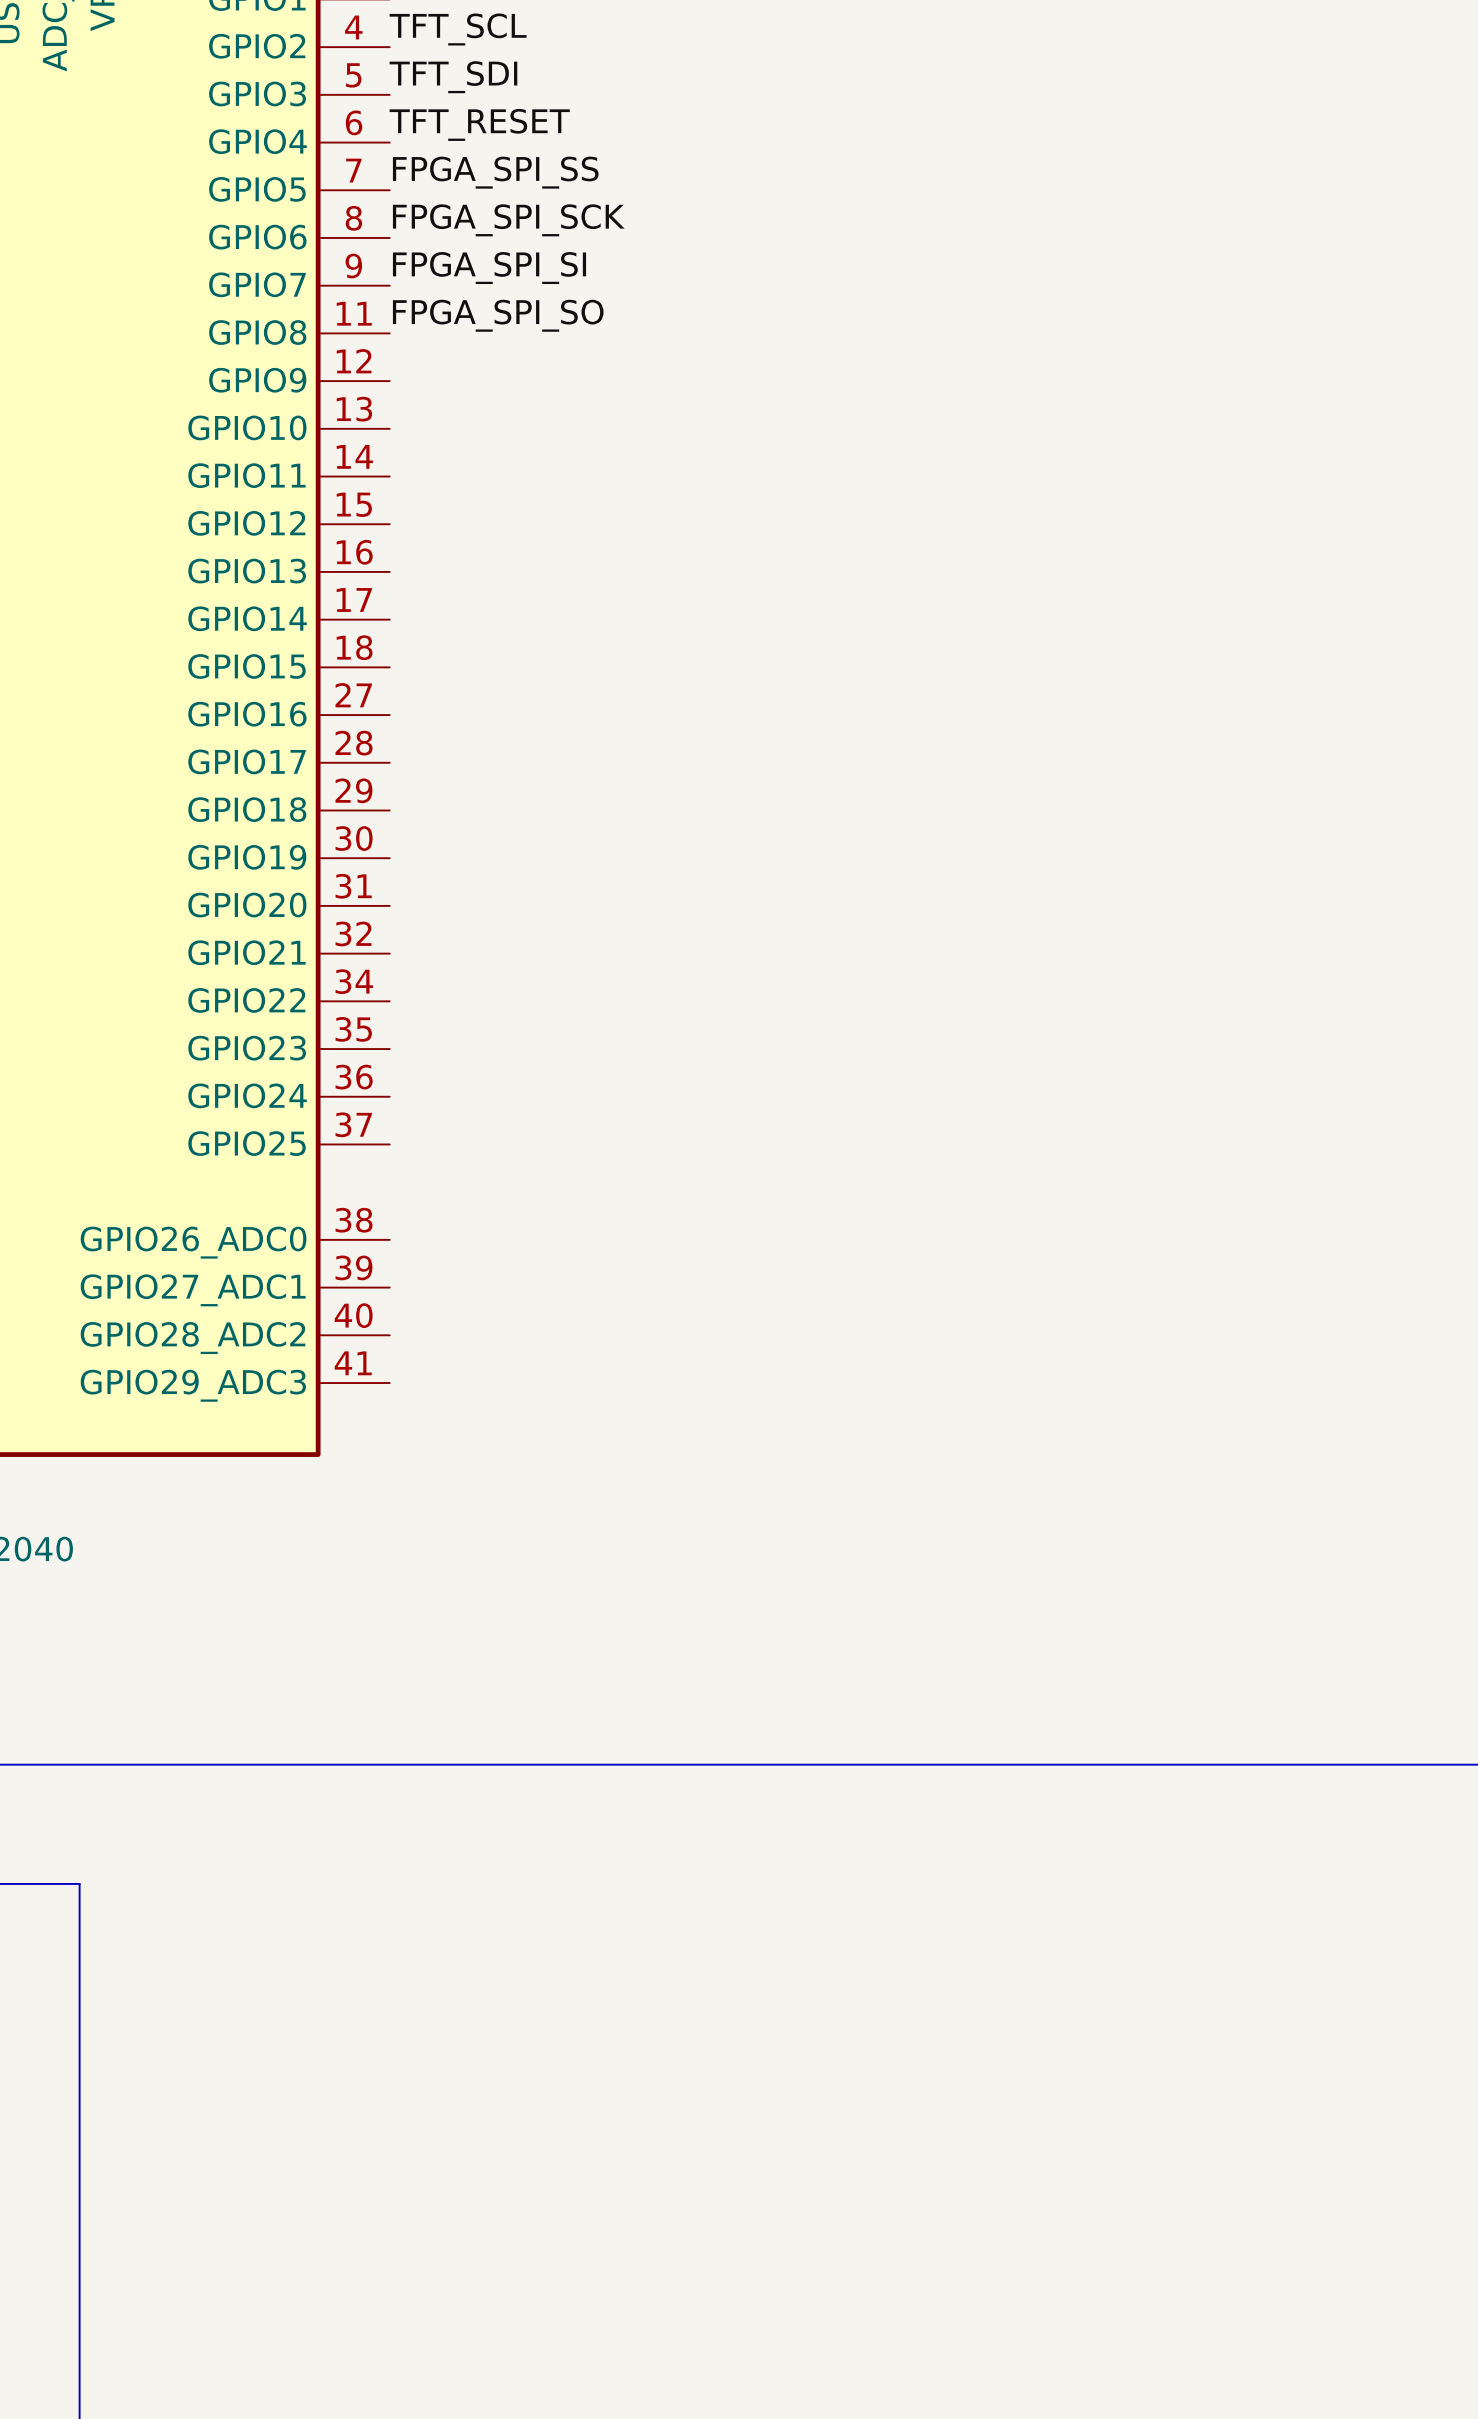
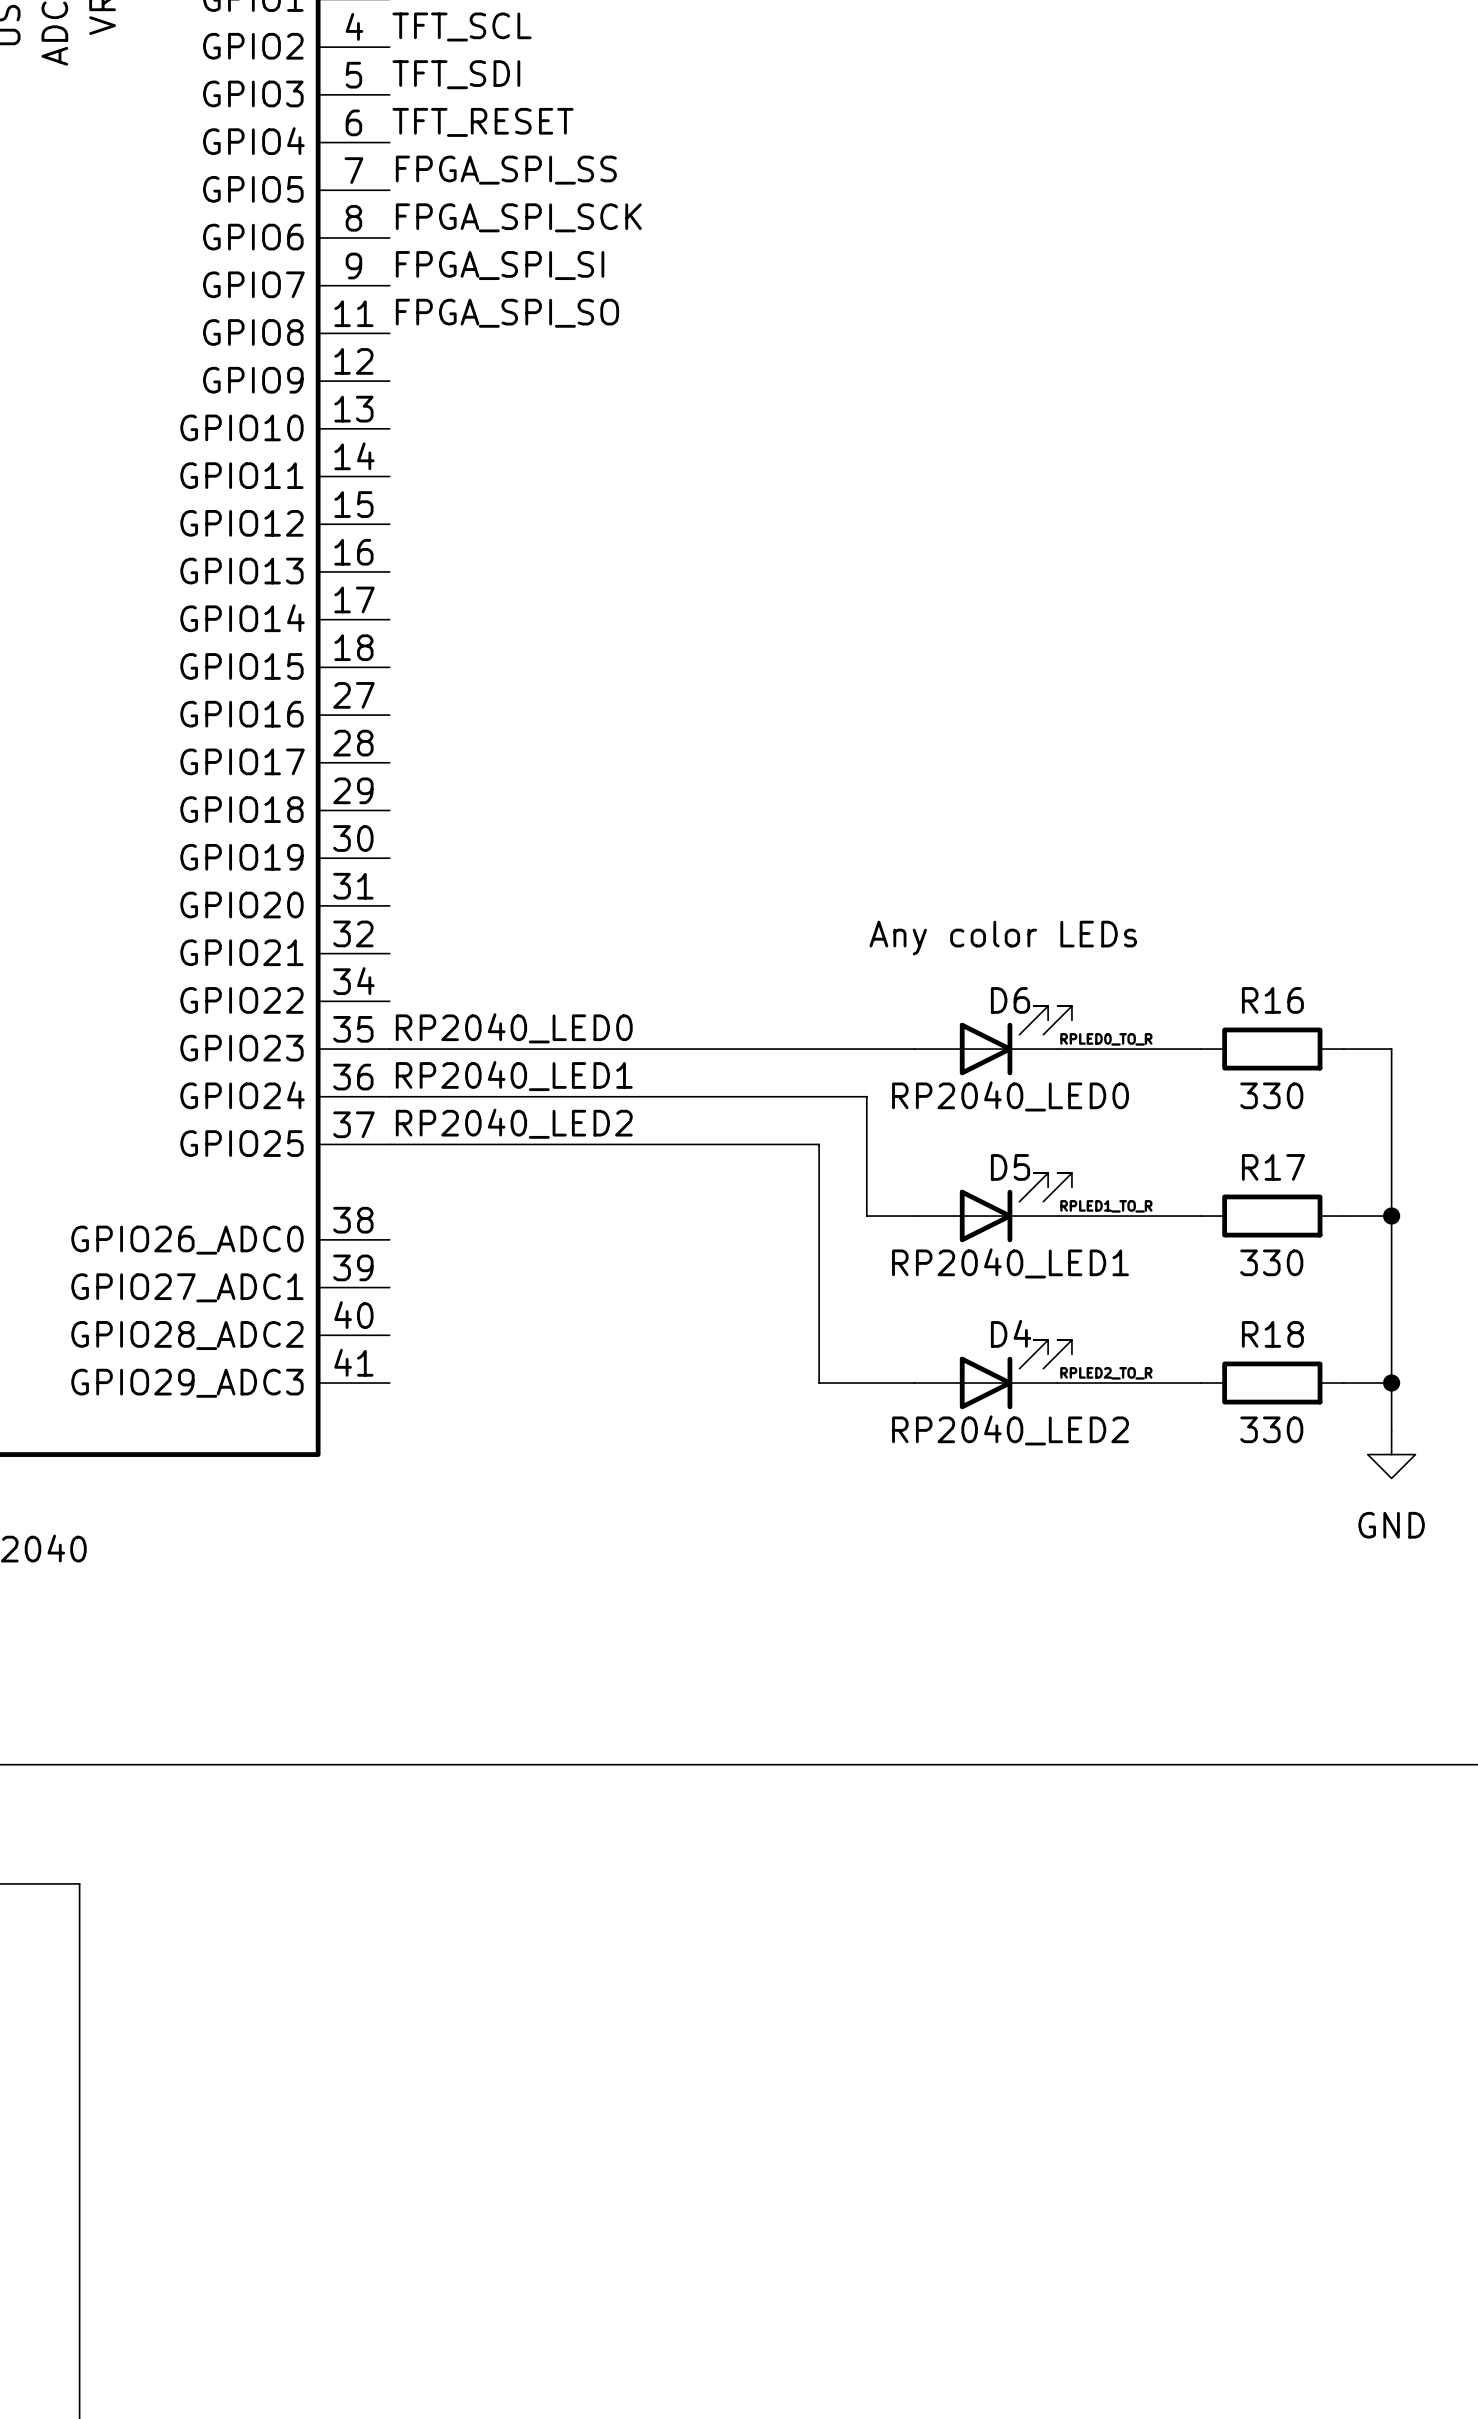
text: none -> Any color LEDs (1003, 938)
label: none -> RP2040_LED0 (514, 1028)
D6: none -> RP2040_LED0 (993, 1040)
label: none -> RPLED0_TO_R (1106, 1039)
wire: none -> (389, 1049) (914, 1049)
wire: none -> (1057, 1049) (1200, 1049)
R16: none -> 330 (1272, 1049)
wire: none -> (1343, 1049) (1391, 1049) (1391, 1430)
label: none -> RP2040_LED1 (514, 1076)
wire: none -> (389, 1096) (866, 1096) (866, 1216) (914, 1216)
label: none -> RP2040_LED2 (514, 1123)
wire: none -> (389, 1144) (819, 1144) (819, 1383) (914, 1383)
D5: none -> RP2040_LED1 (993, 1207)
label: none -> RPLED1_TO_R (1106, 1206)
wire: none -> (1057, 1216) (1200, 1216)
R17: none -> 330 (1272, 1216)
wire: none -> (1343, 1216) (1391, 1216)
junction: none -> (1391, 1216)
D4: none -> RP2040_LED2 (993, 1374)
label: none -> RPLED2_TO_R (1106, 1373)
wire: none -> (1057, 1383) (1200, 1383)
R18: none -> 330 (1272, 1383)
wire: none -> (1343, 1383) (1391, 1383)
junction: none -> (1391, 1383)
power symbol: none -> GND (1391, 1454)

